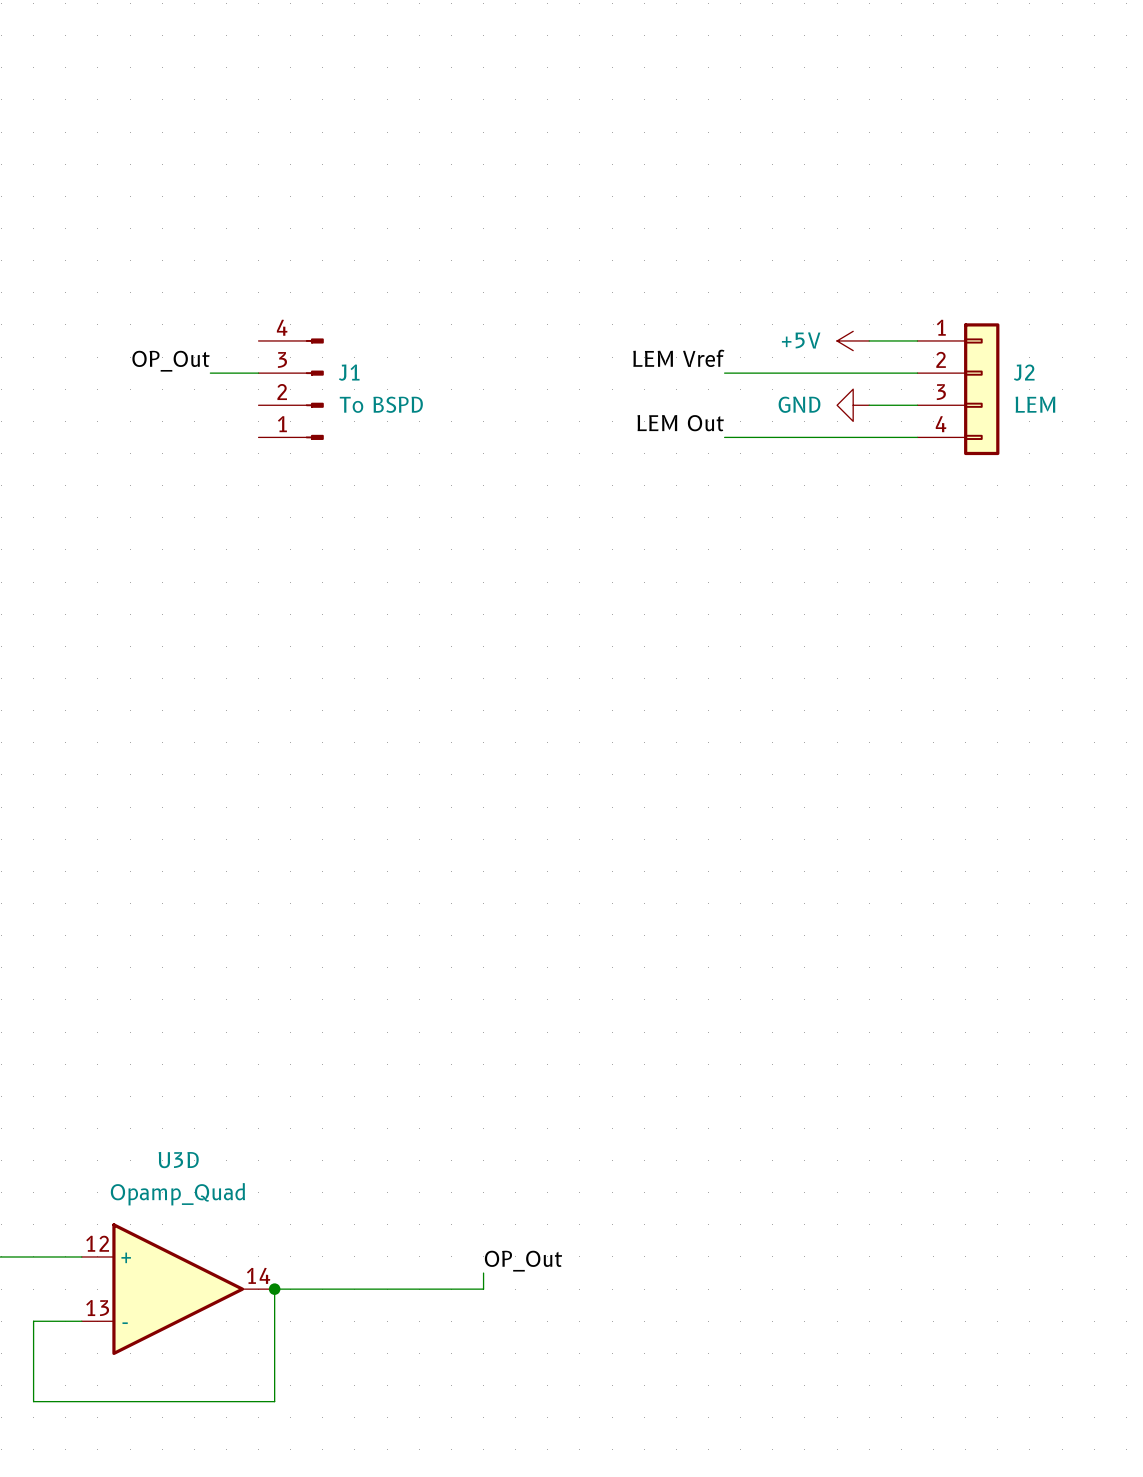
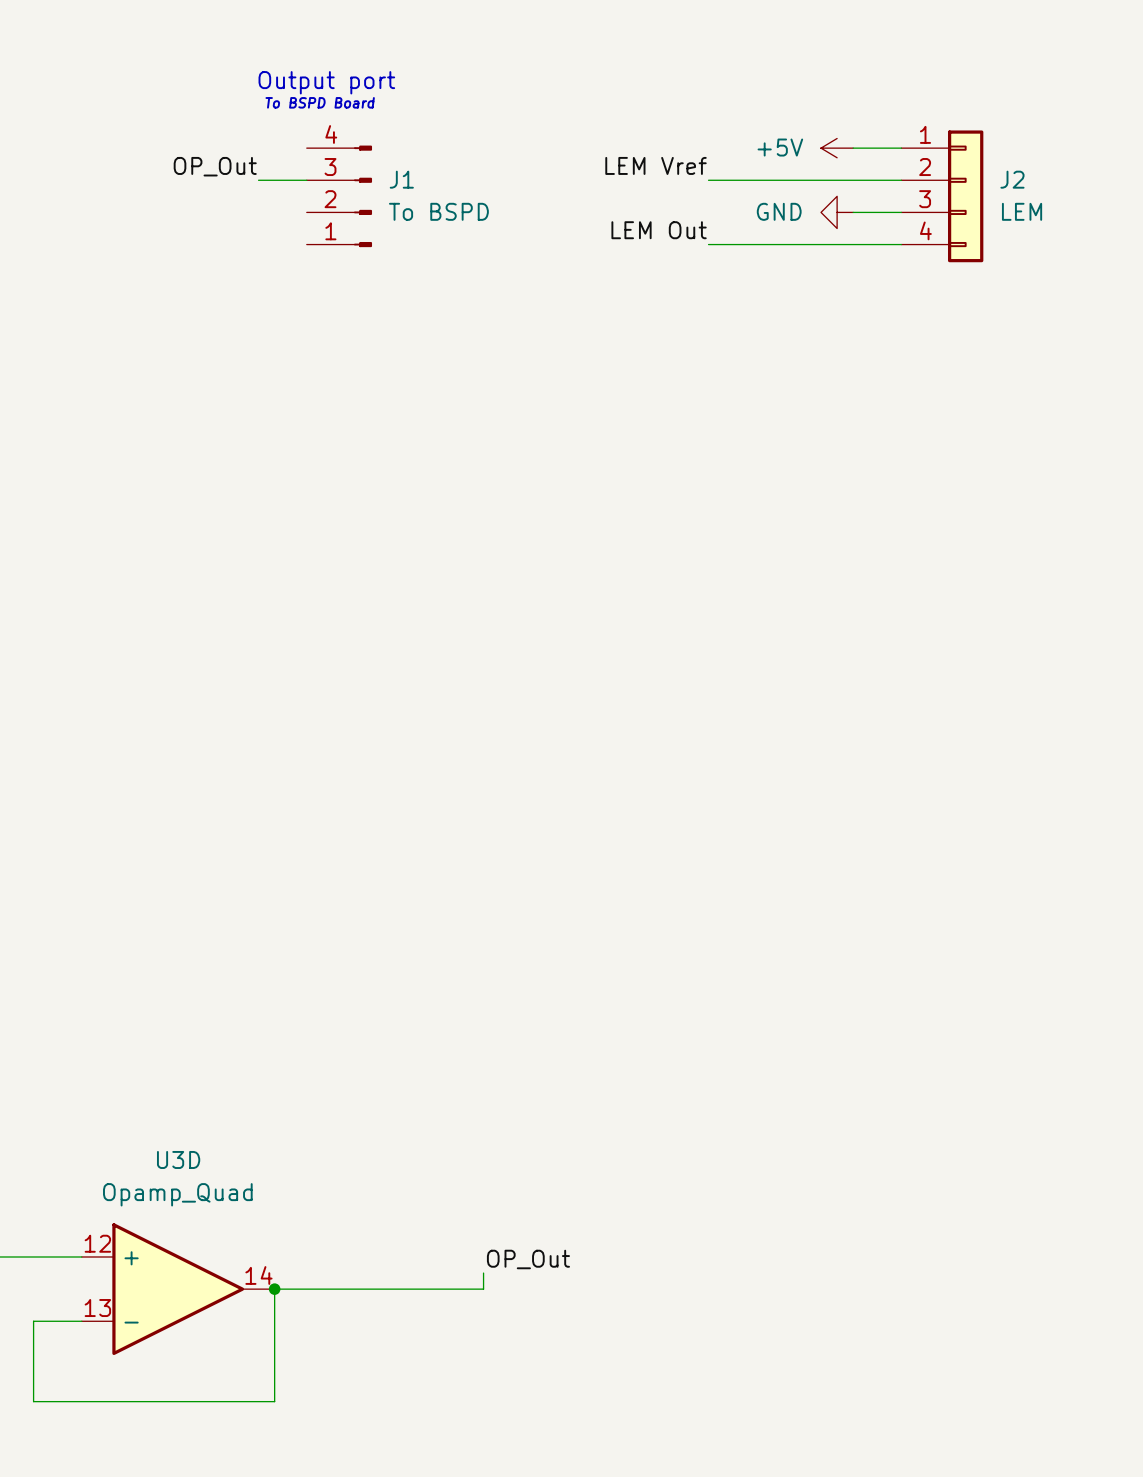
text: none -> Output port (326, 82)
text: none -> To BSPD Board (320, 102)
power symbol position: +5V (853, 340) -> +5V (837, 148)
wire: (869, 340) (917, 340) -> (853, 148) (901, 148)
label position: LEM Vref (678, 358) -> LEM Vref (656, 165)
label position: OP_Out (170, 361) -> OP_Out (215, 166)
wire: (210, 373) (258, 373) -> (258, 180) (306, 180)
wire: (724, 373) (917, 373) -> (708, 180) (901, 180)
J1 position: (291, 389) -> (339, 196)
J2 position: (958, 389) -> (942, 196)
power symbol position: GND (853, 405) -> GND (837, 212)
wire: (869, 405) (917, 405) -> (853, 212) (901, 212)
label position: LEM Out (680, 423) -> LEM Out (659, 230)
wire: (724, 437) (917, 437) -> (708, 244) (901, 244)

